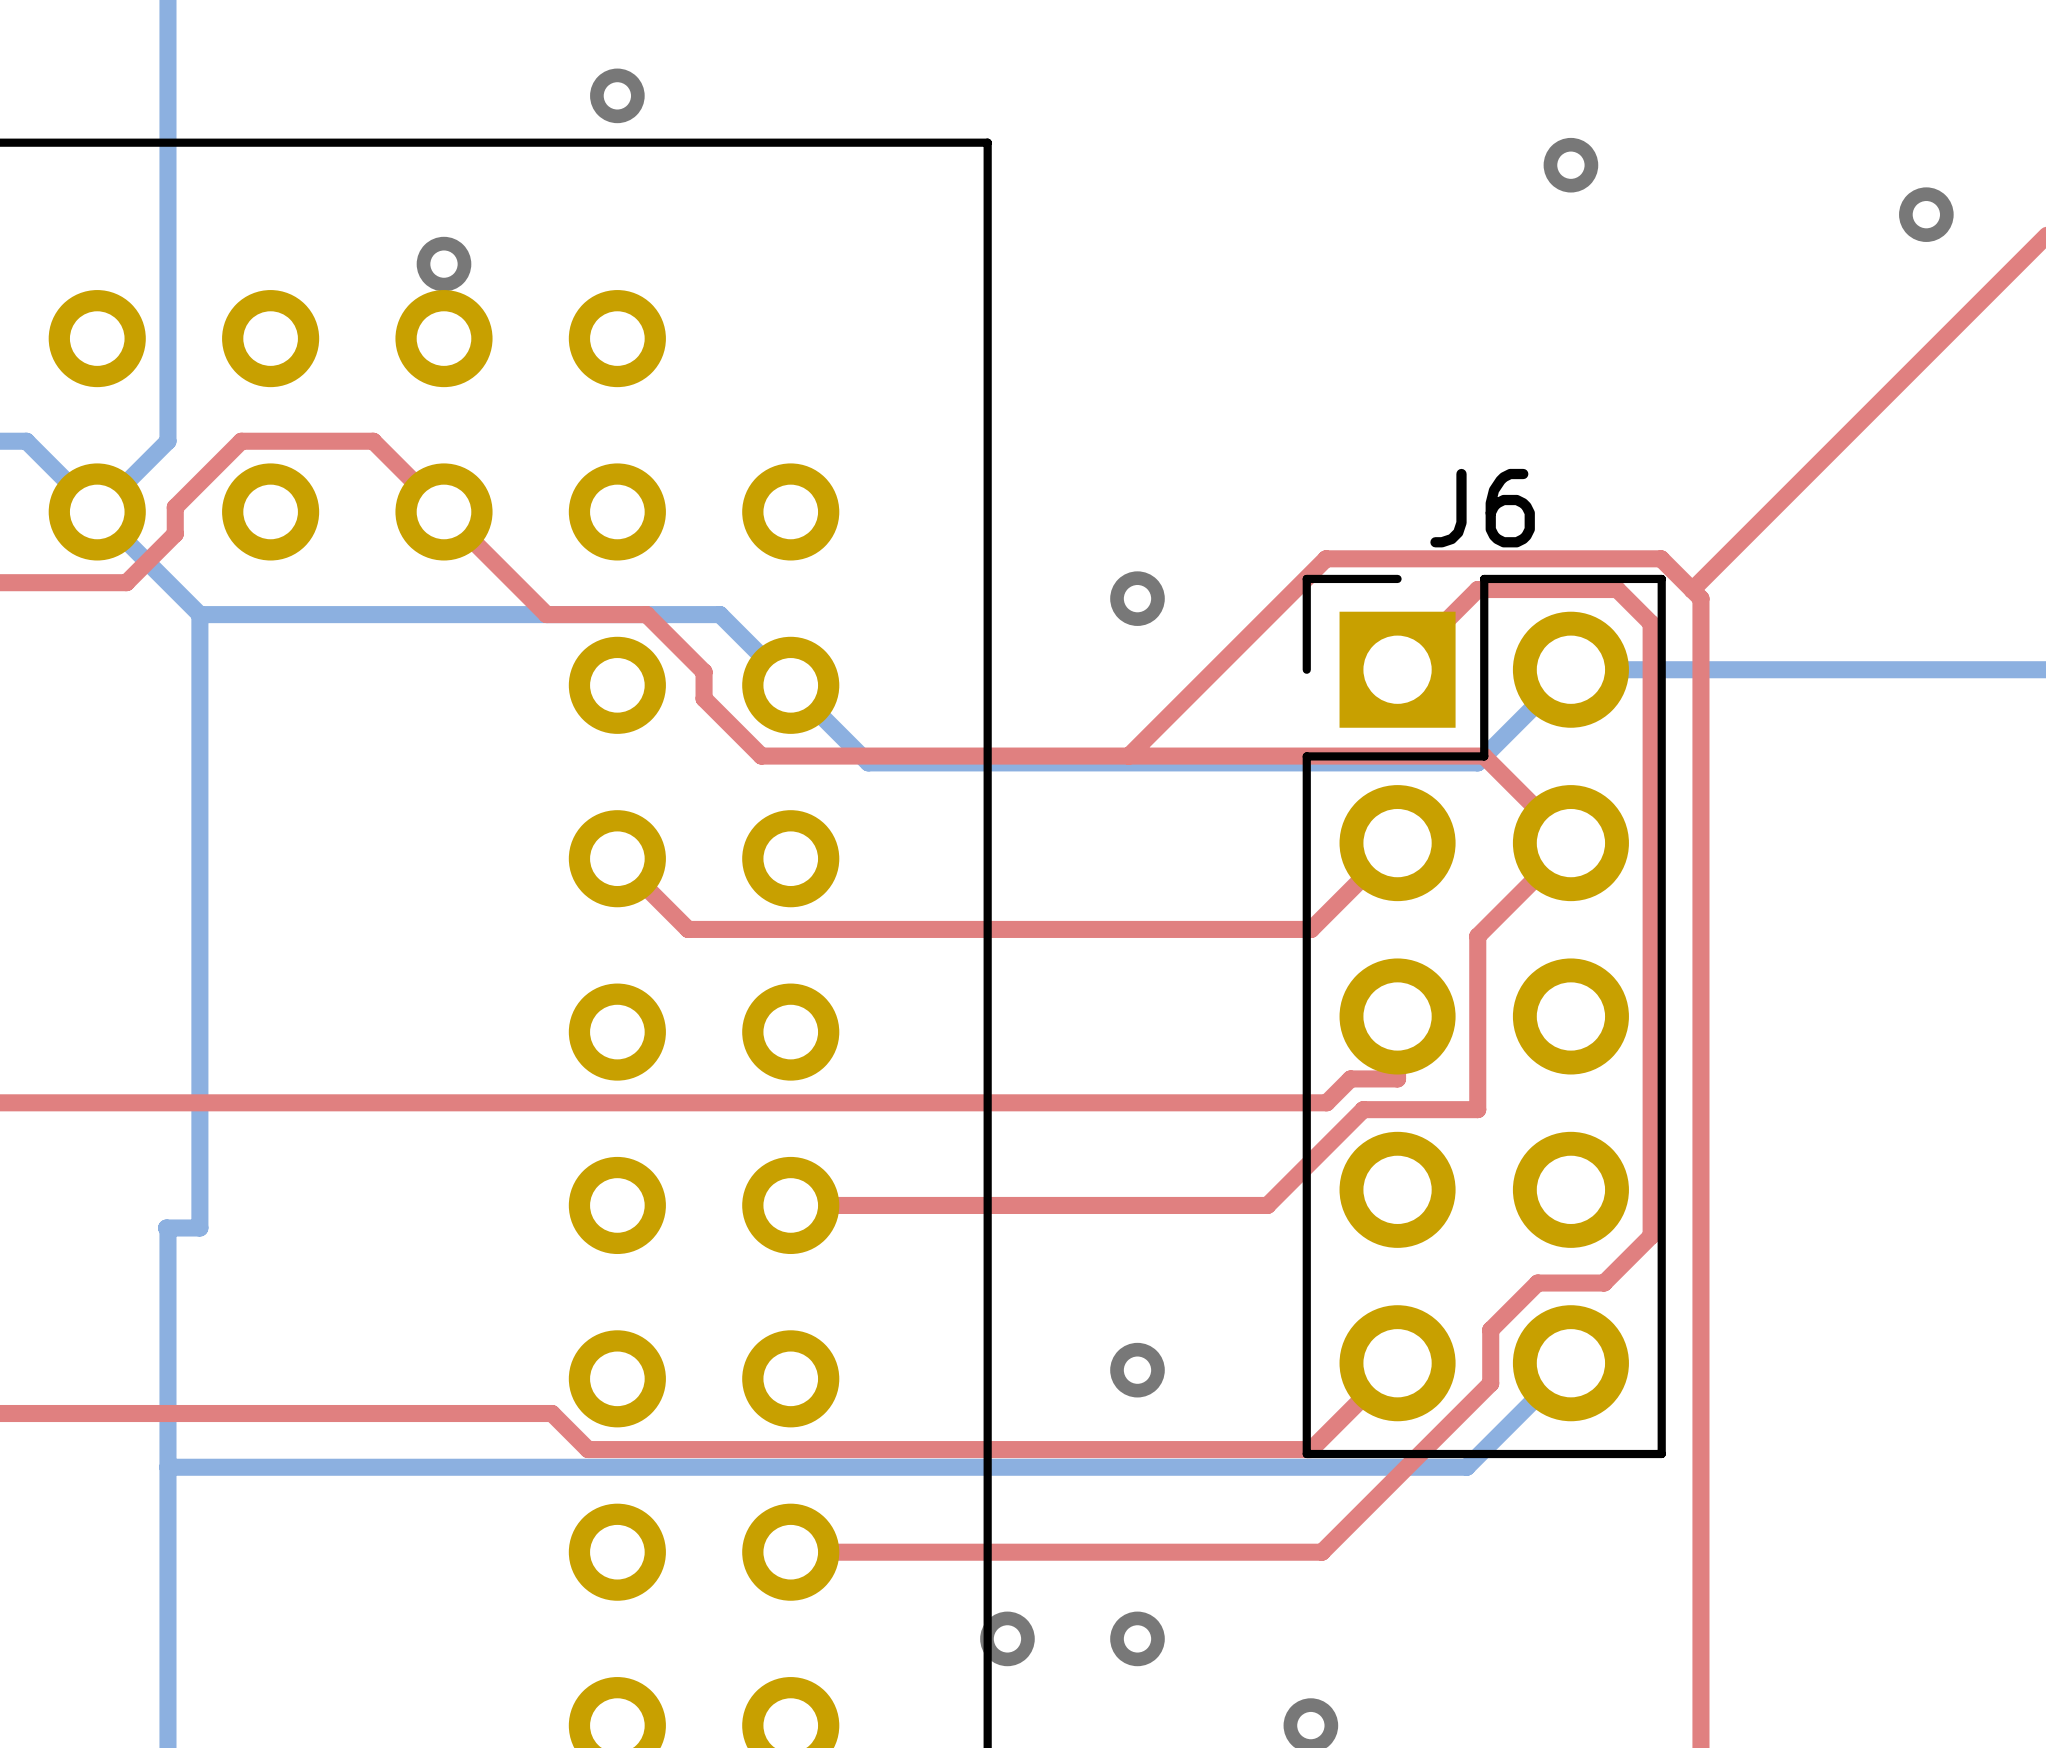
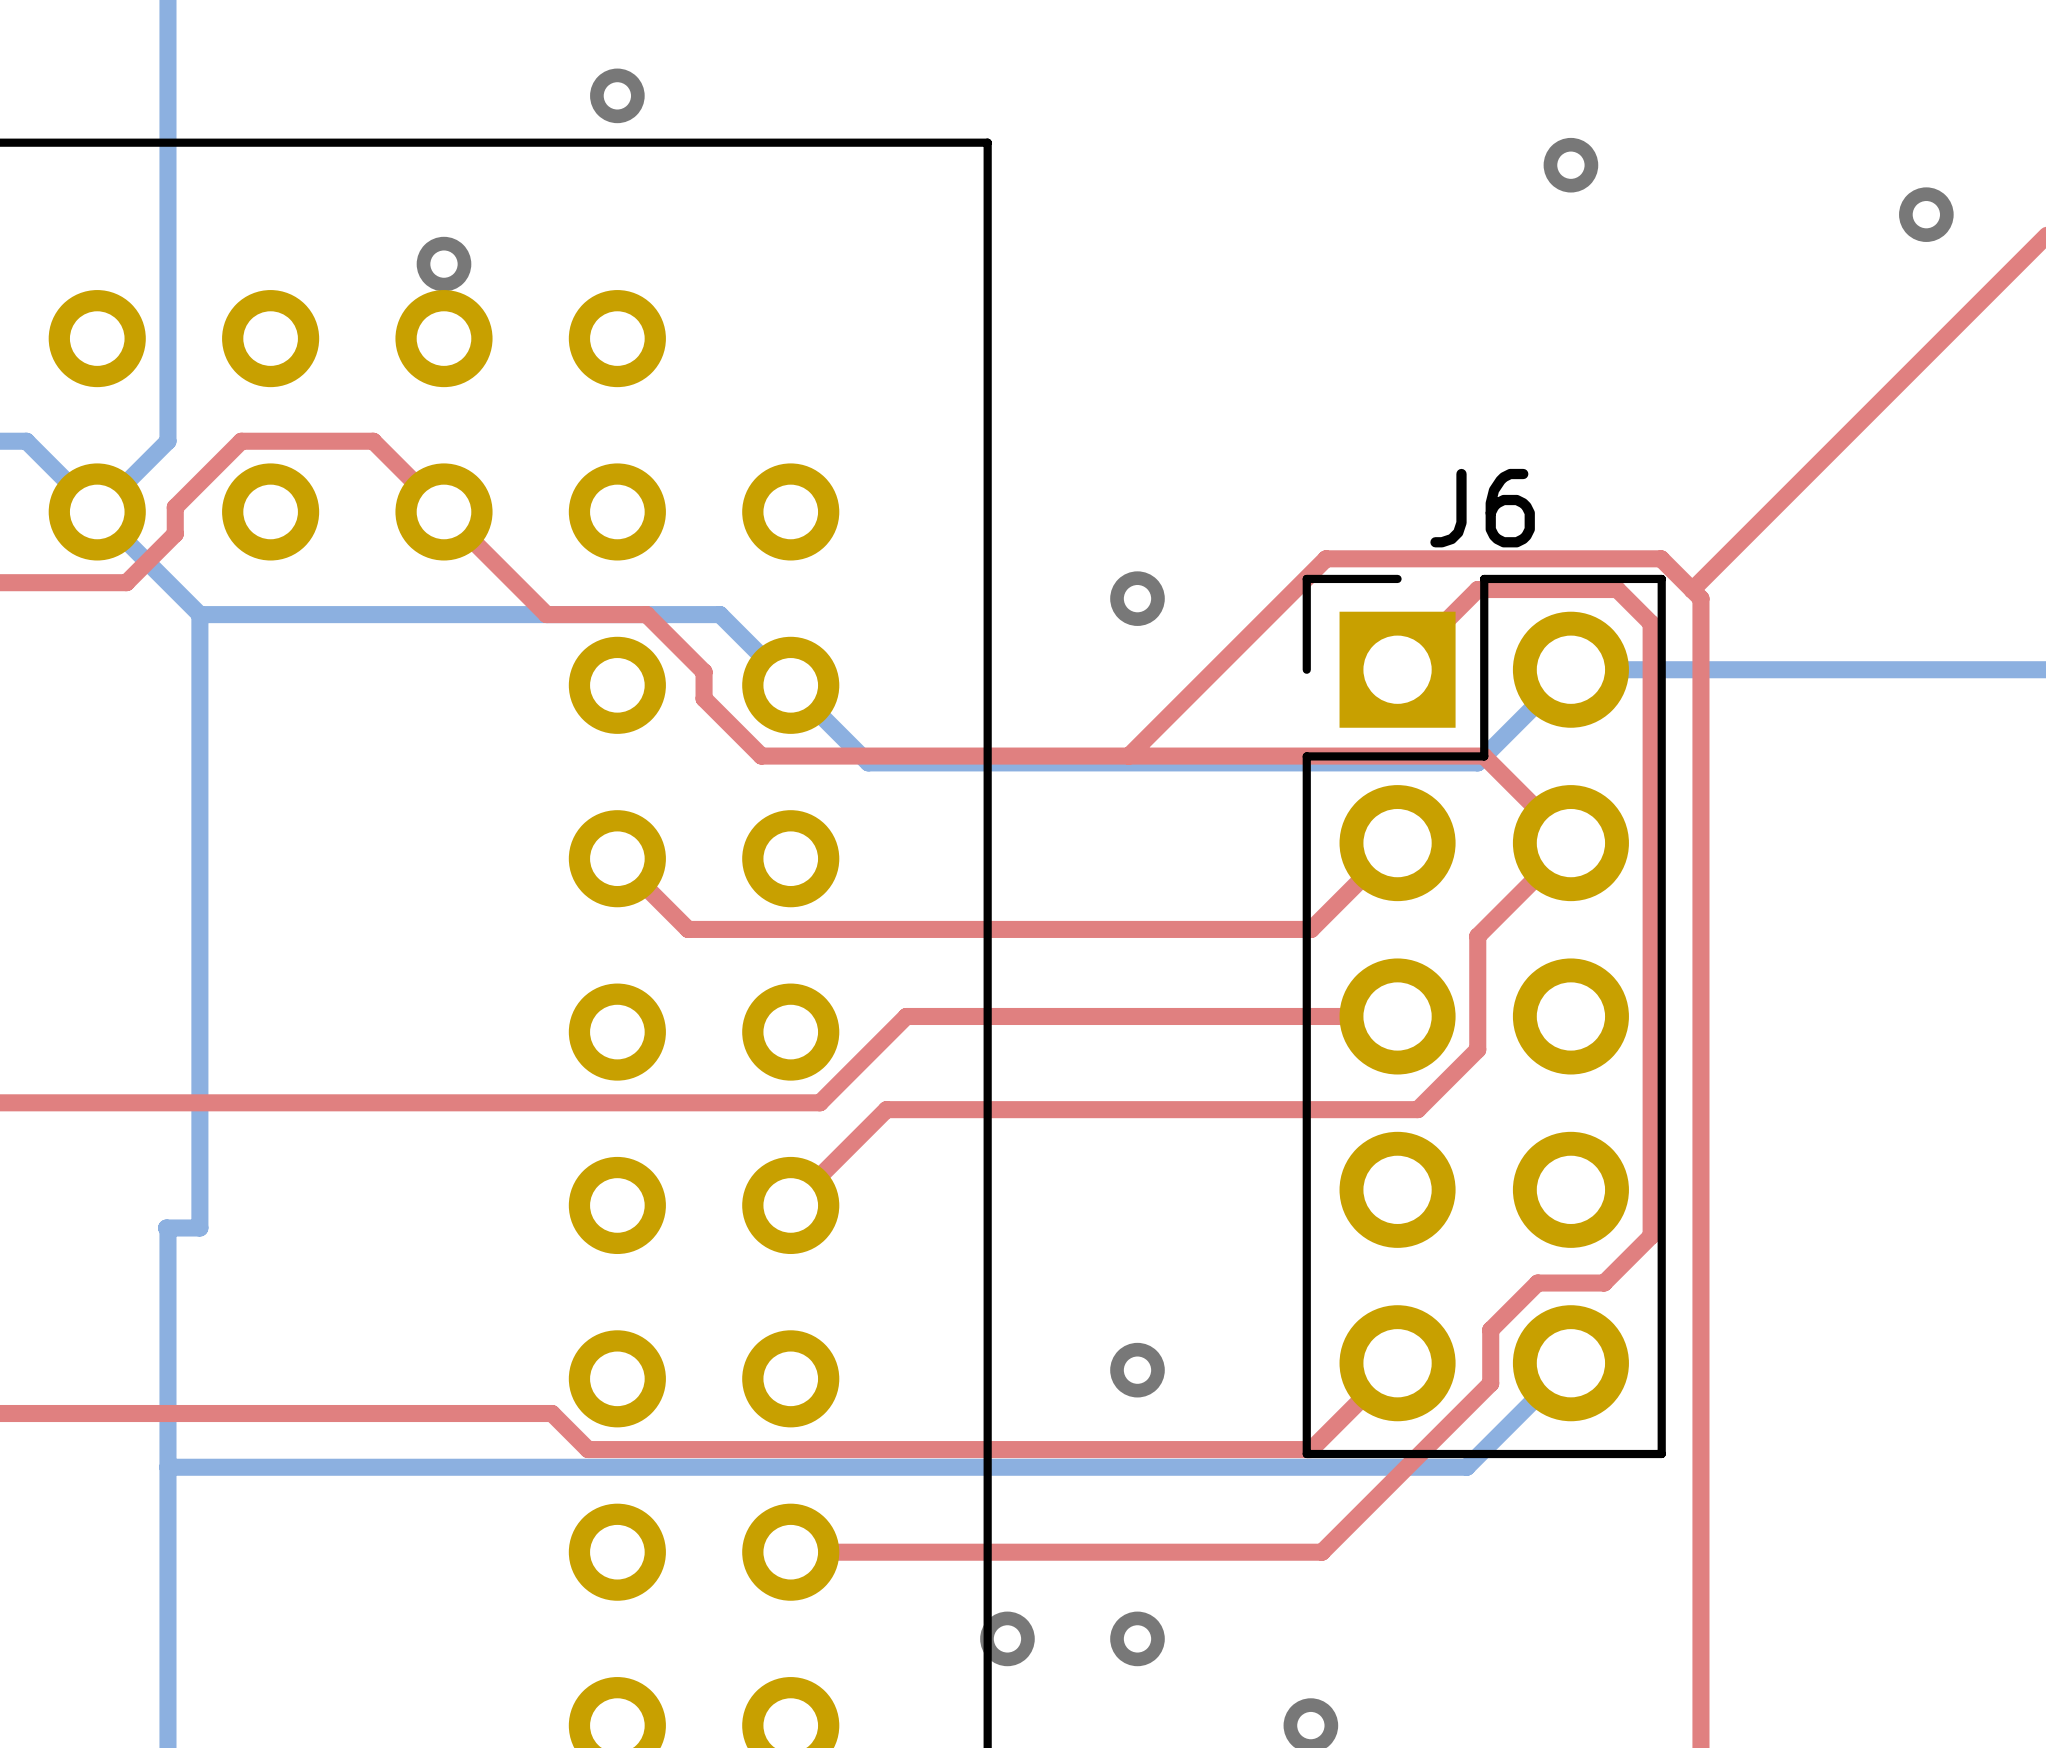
top track: (1397, 1016) (1397, 1078) (1350, 1078) (1326, 1102) (820, 1102) -> (1397, 1016) (906, 1016) (820, 1102)
top track: (1477, 1049) (1477, 1109) (1417, 1109) -> (1477, 1049) (1417, 1109)
top track: (1363, 1109) (1267, 1205) (790, 1205) -> (1363, 1109) (886, 1109) (790, 1205)

